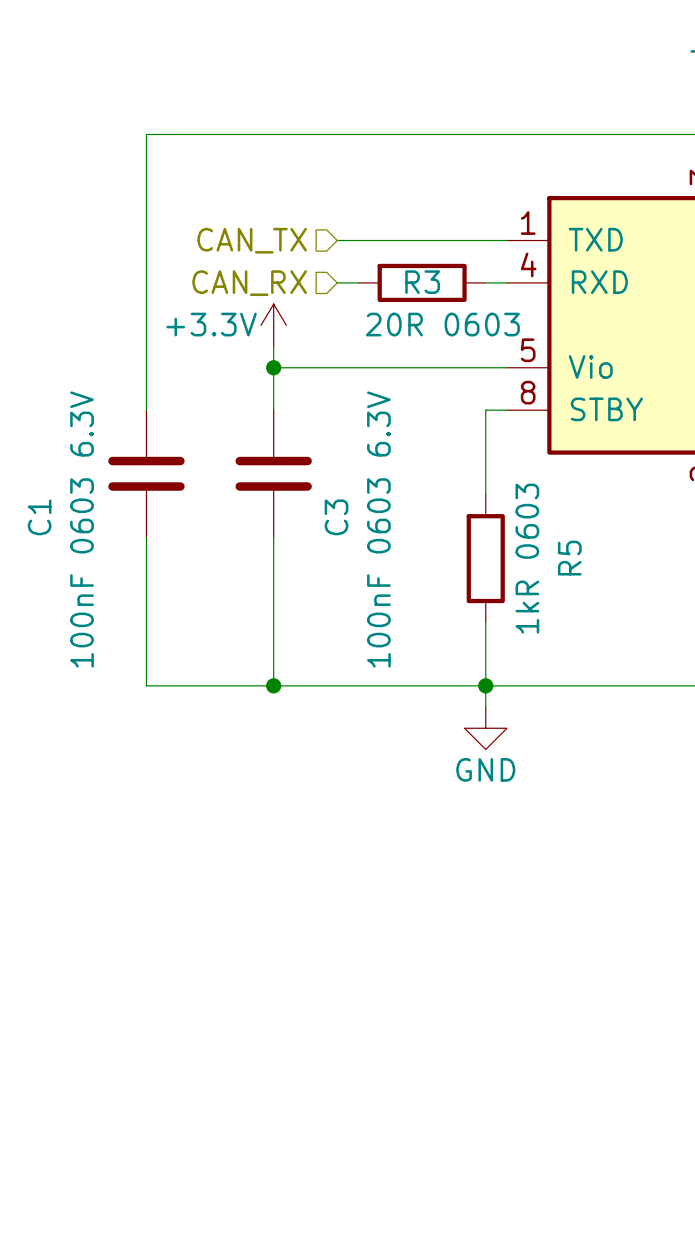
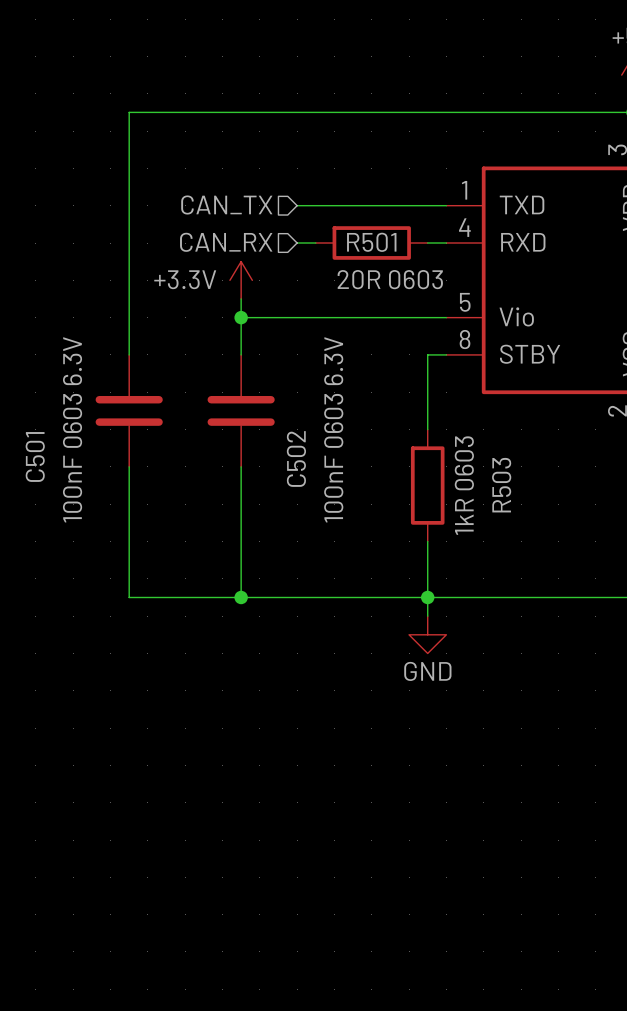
R3 name: R3 (422, 282) -> R501 (371, 242)
C1 name: C1 (39, 517) -> C501 (35, 456)
C3 name: C3 (336, 517) -> C502 (296, 459)
R5 name: R5 (569, 558) -> R503 (501, 485)

